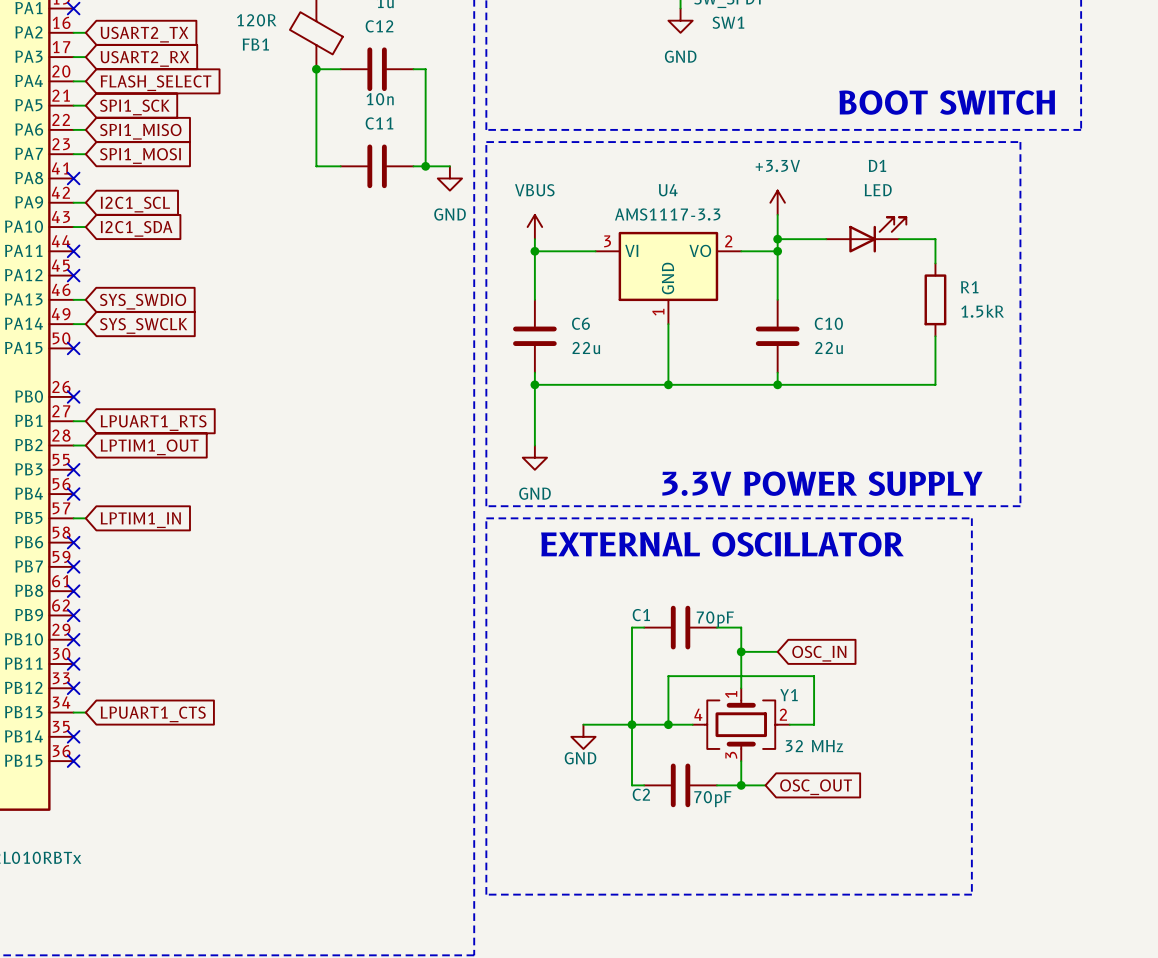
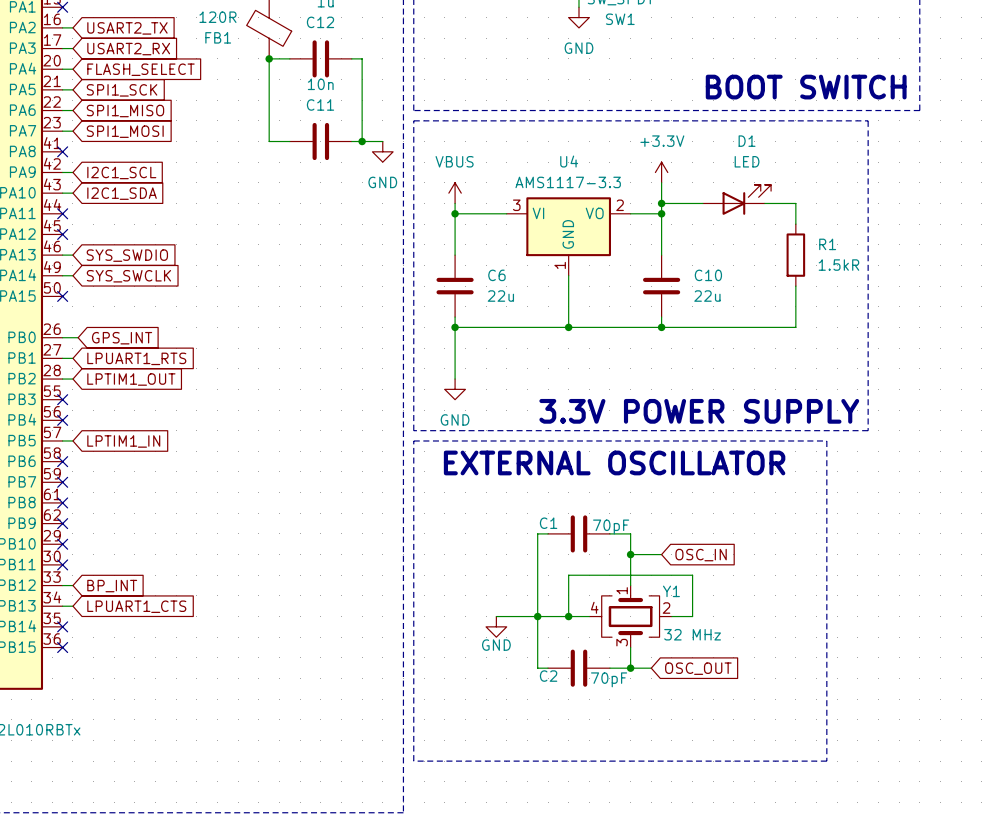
wire: none -> (62, 337) (78, 337)
no-connect mark: (73, 396) -> none
global label: none -> GPS_INT (122, 338)
wire: none -> (62, 585) (72, 585)
no-connect mark: (73, 688) -> none
global label: none -> BP_INT (112, 586)

